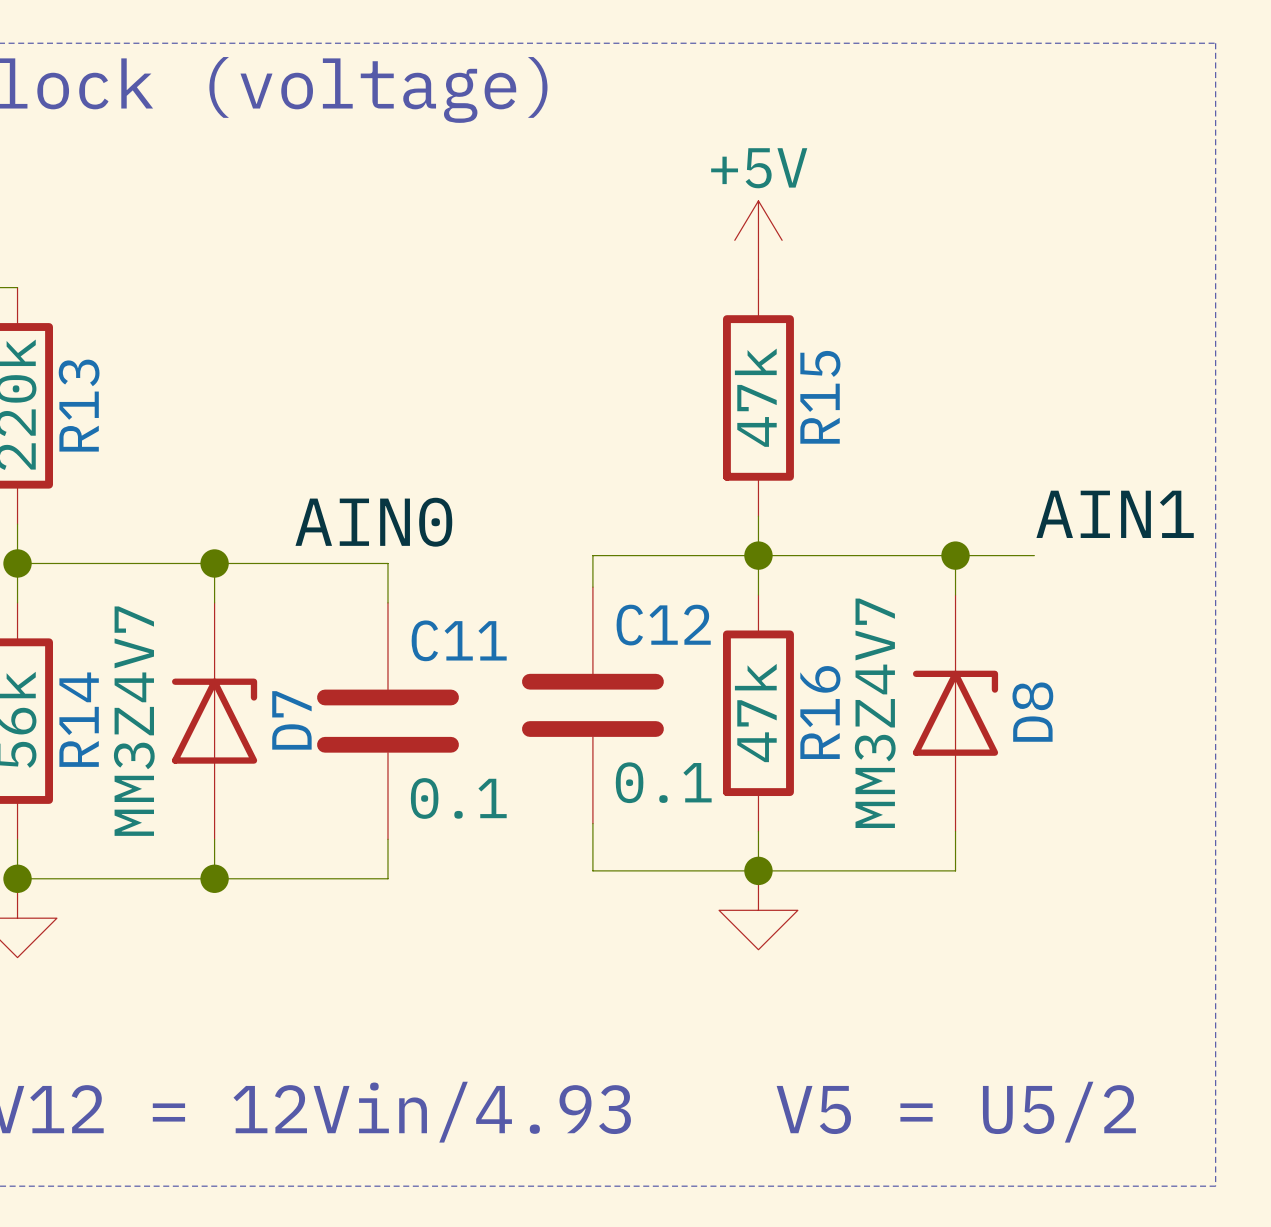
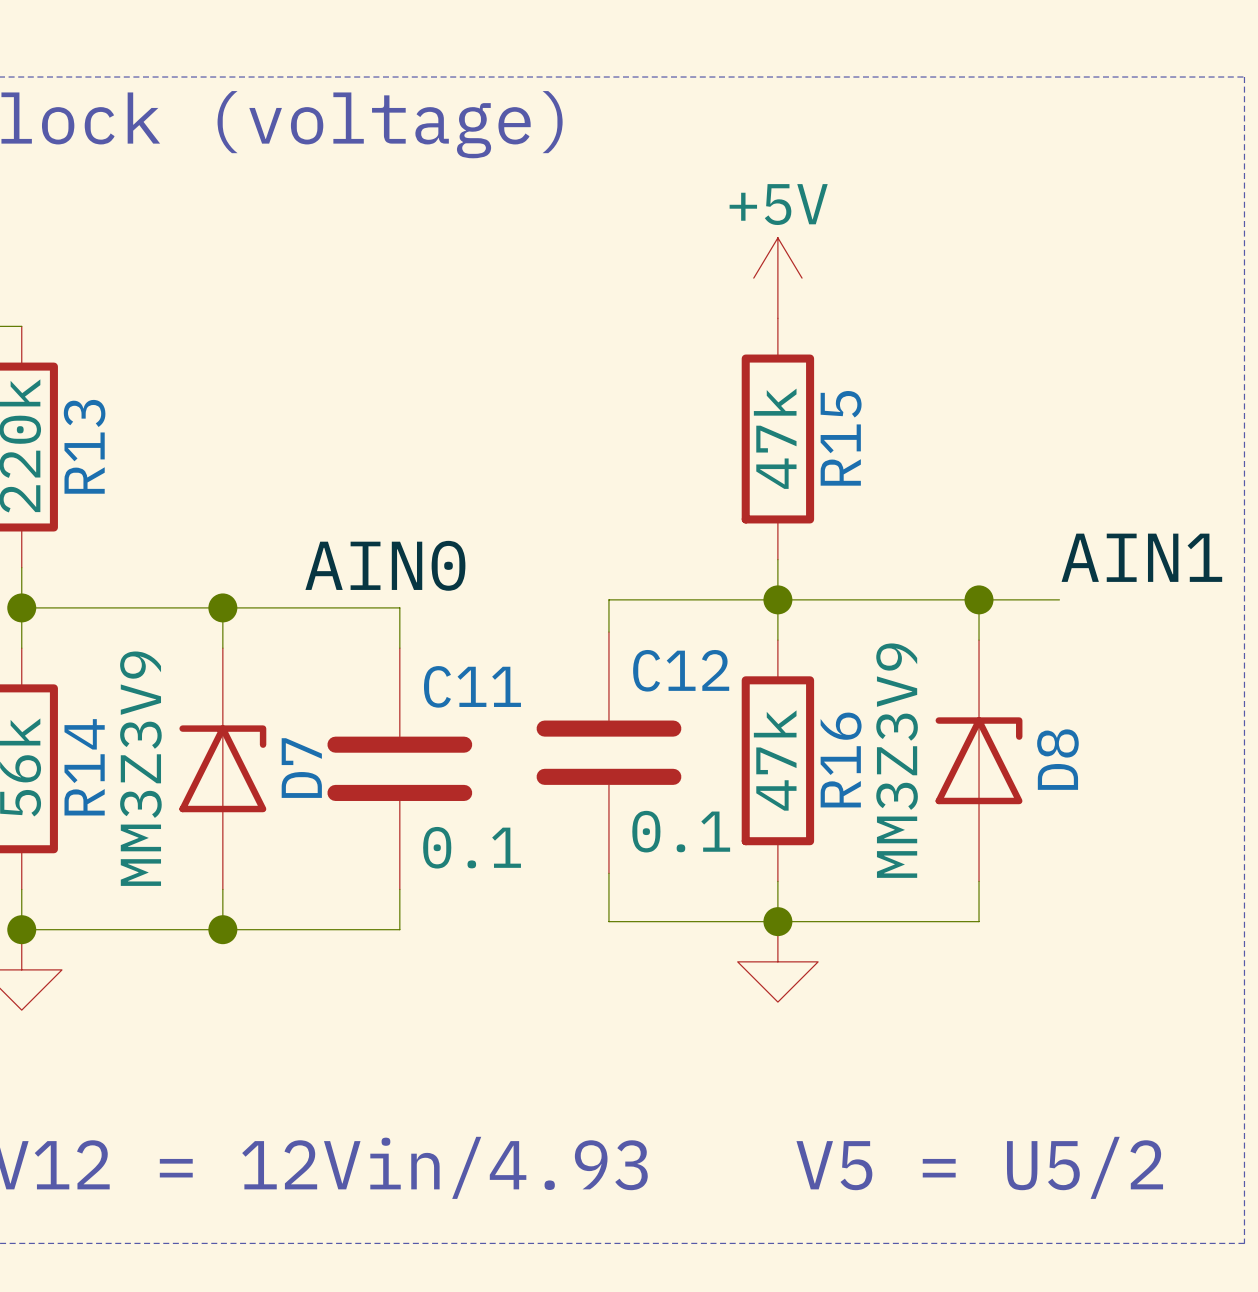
D8 value: MM3Z4V7 (875, 713) -> MM3Z3V9 (897, 760)
D7 value: MM3Z4V7 (134, 721) -> MM3Z3V9 (140, 768)

